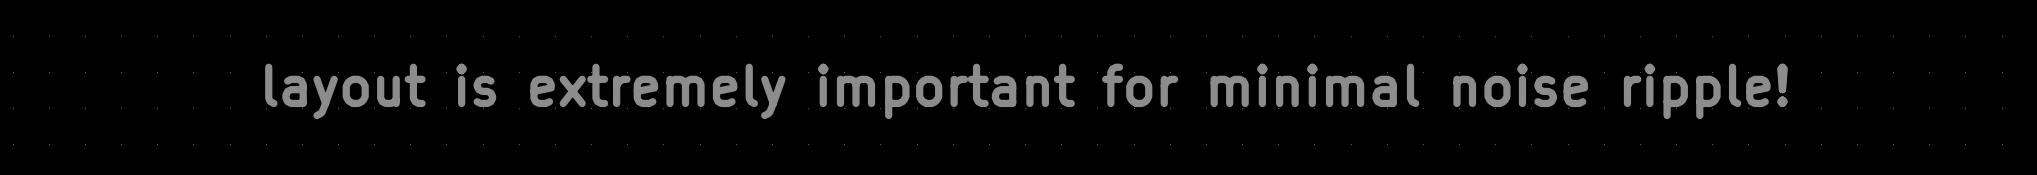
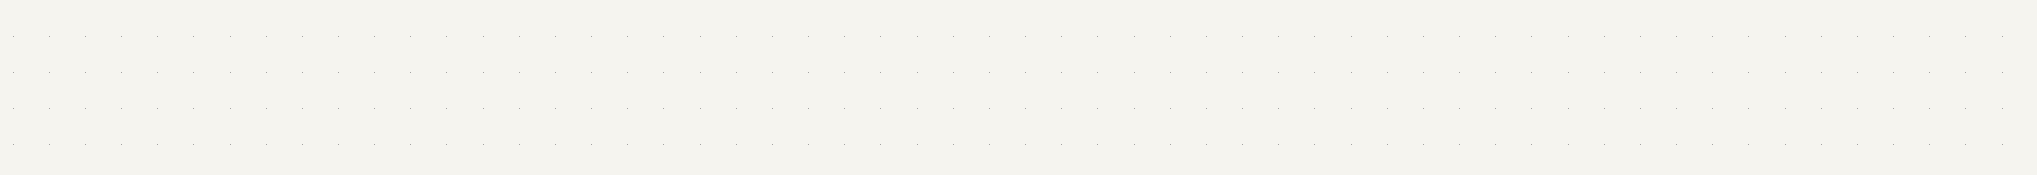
text: layout is extremely important for minimal noise ripple! (1026, 91) -> none

